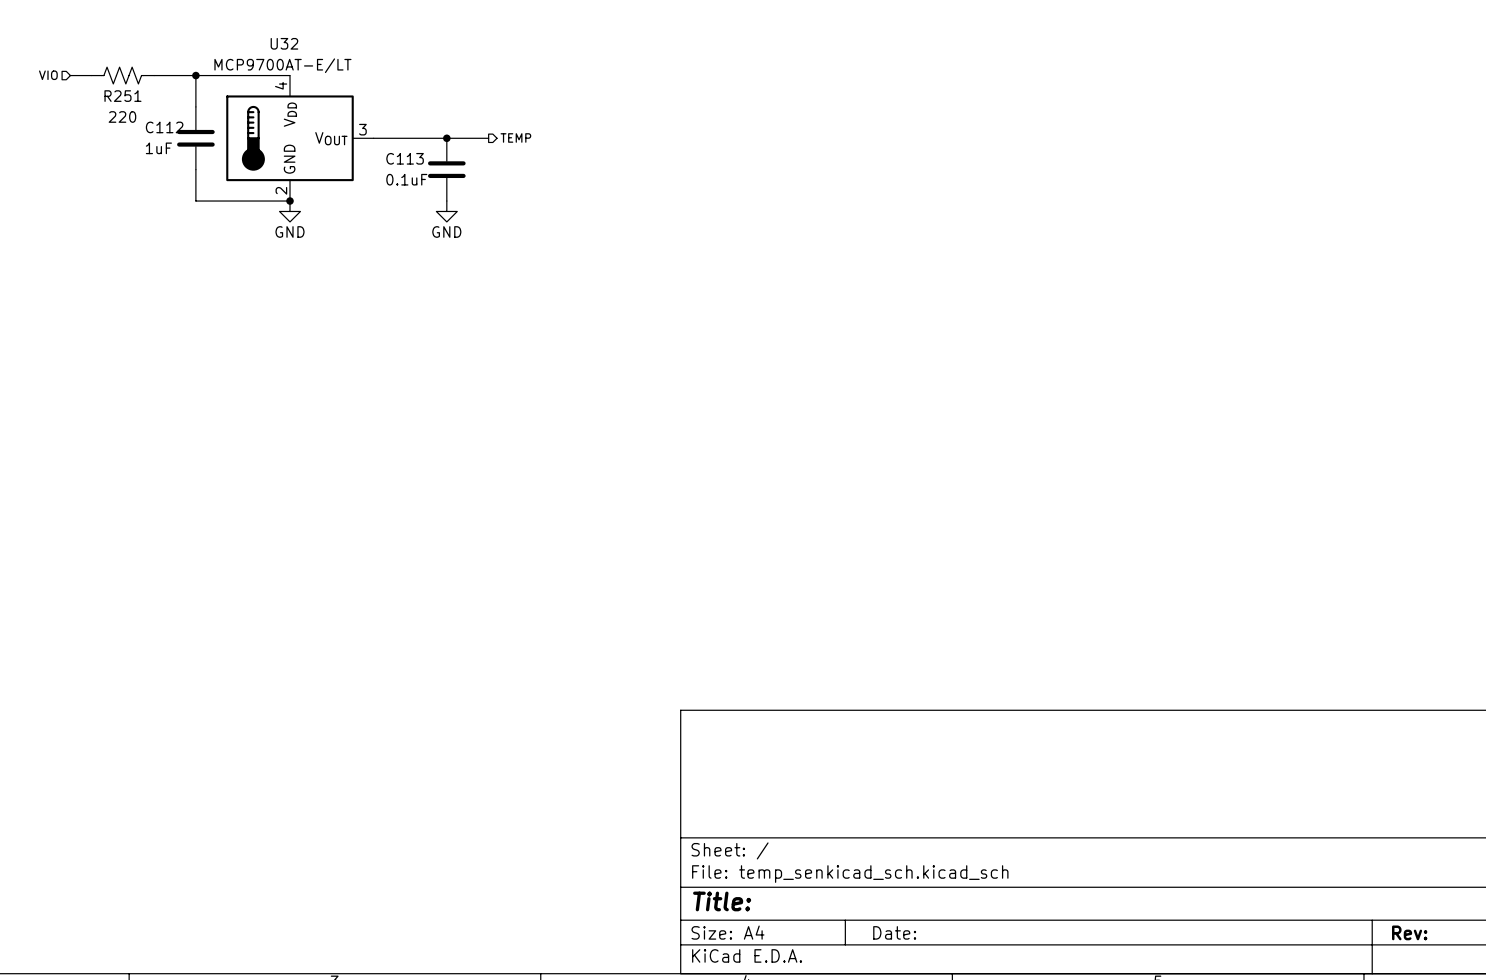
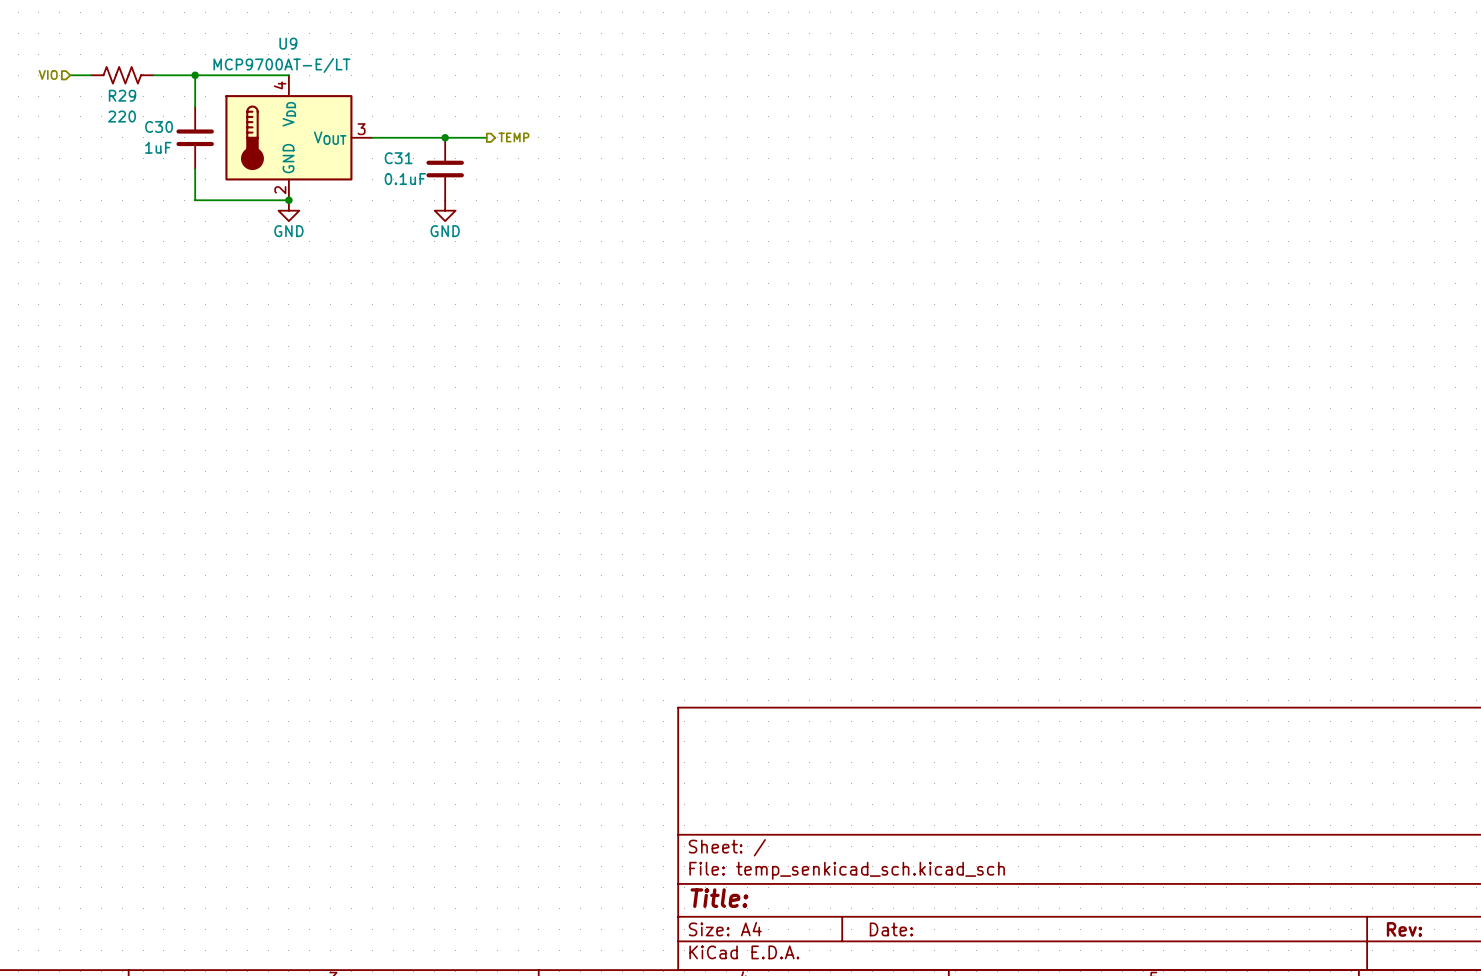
U32 name: U32 (284, 43) -> U9 (288, 43)
R251 name: R251 (122, 96) -> R29 (122, 95)
C112 name: C112 (164, 127) -> C30 (159, 126)
C113 name: C113 (405, 158) -> C31 (398, 158)

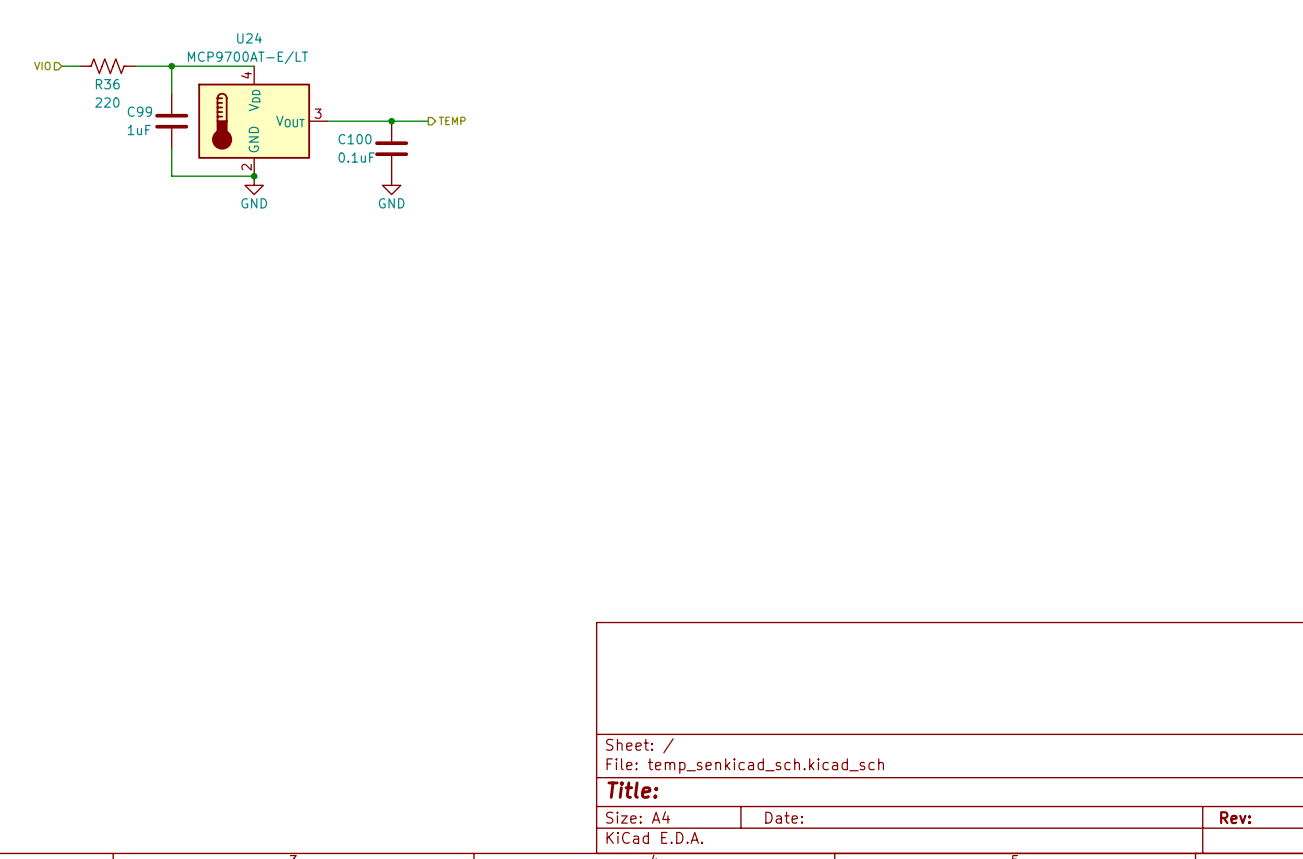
U9 name: U9 (288, 43) -> U24 (249, 38)
R29 name: R29 (122, 95) -> R36 (107, 84)
C30 name: C30 (159, 126) -> C99 (139, 111)
C31 name: C31 (398, 158) -> C100 (355, 139)

